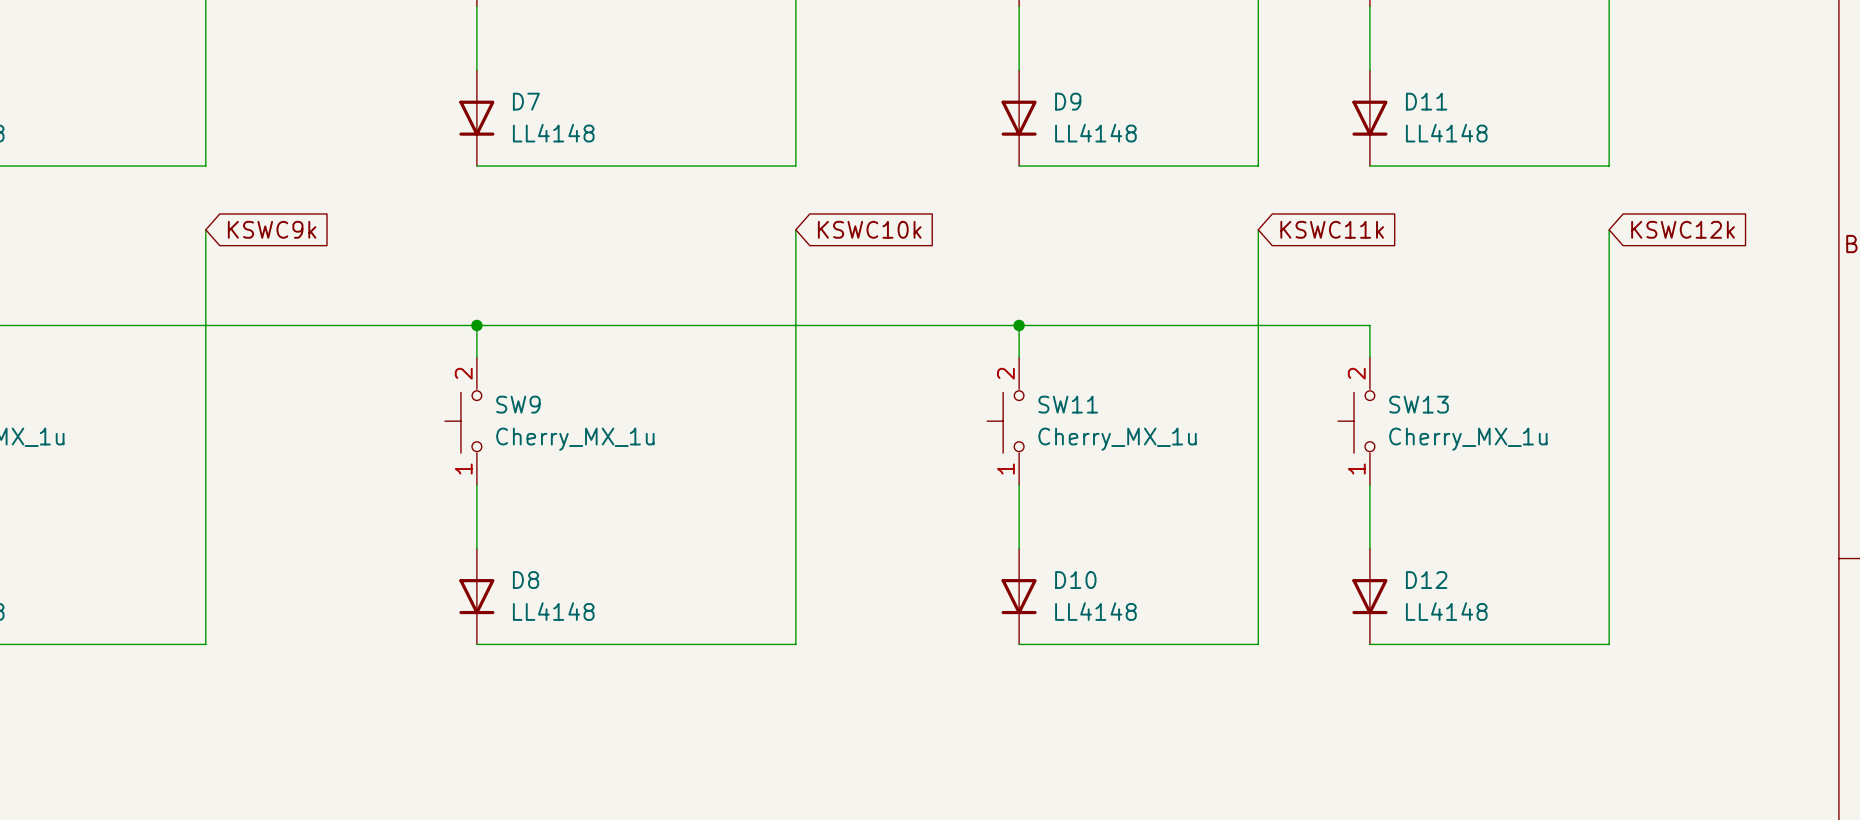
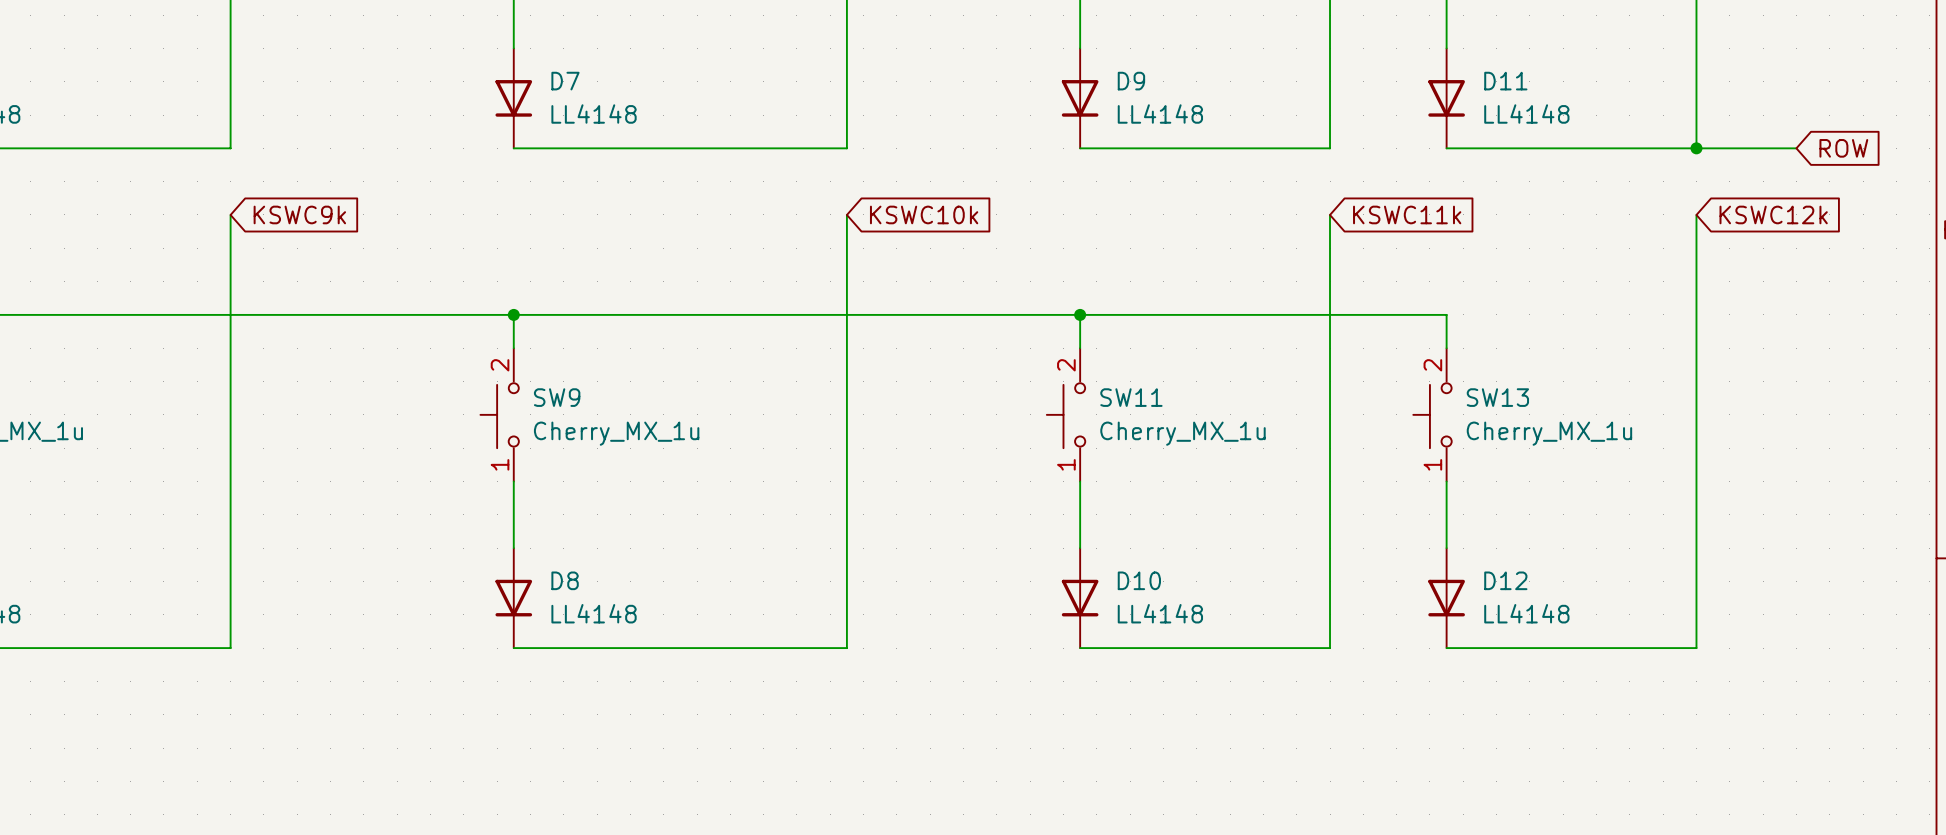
wire: none -> (1696, 148) (1796, 148)
junction: none -> (1696, 148)
global label: none -> ROW (1843, 148)

